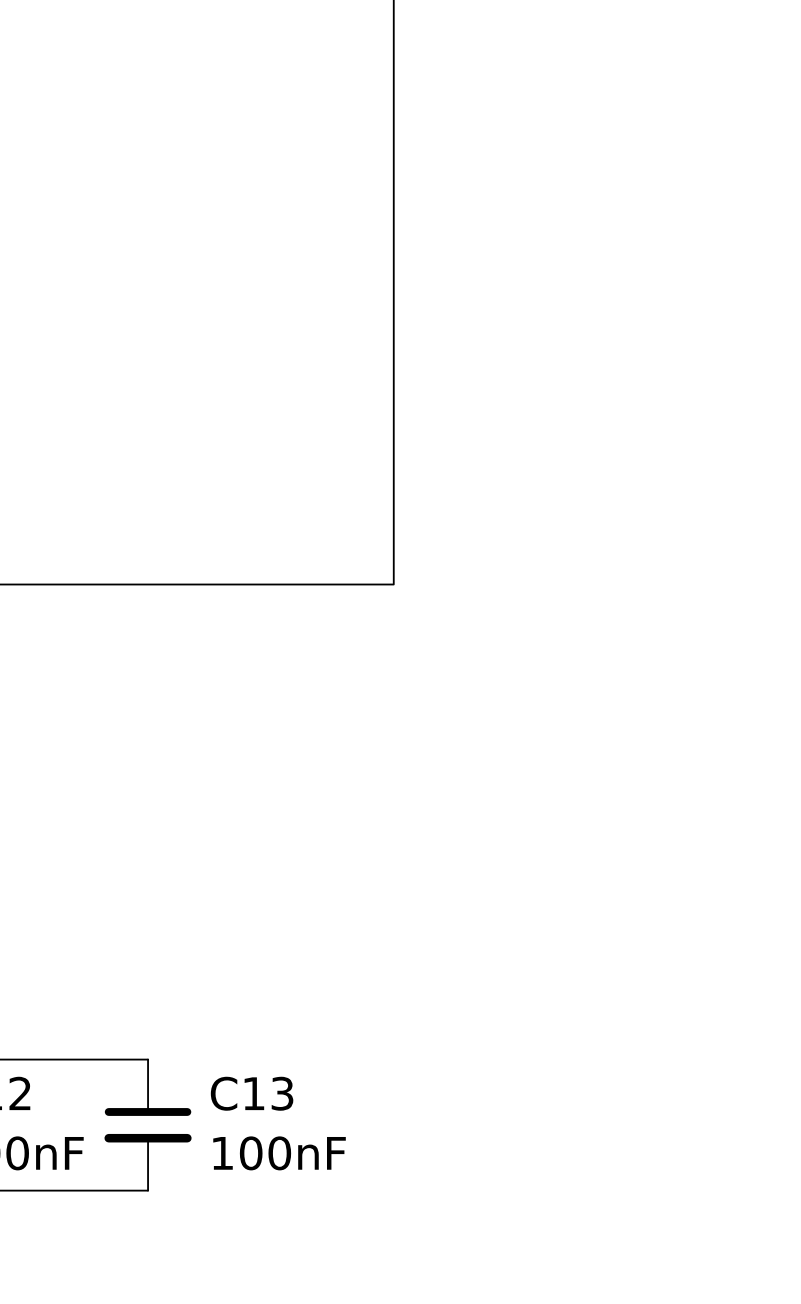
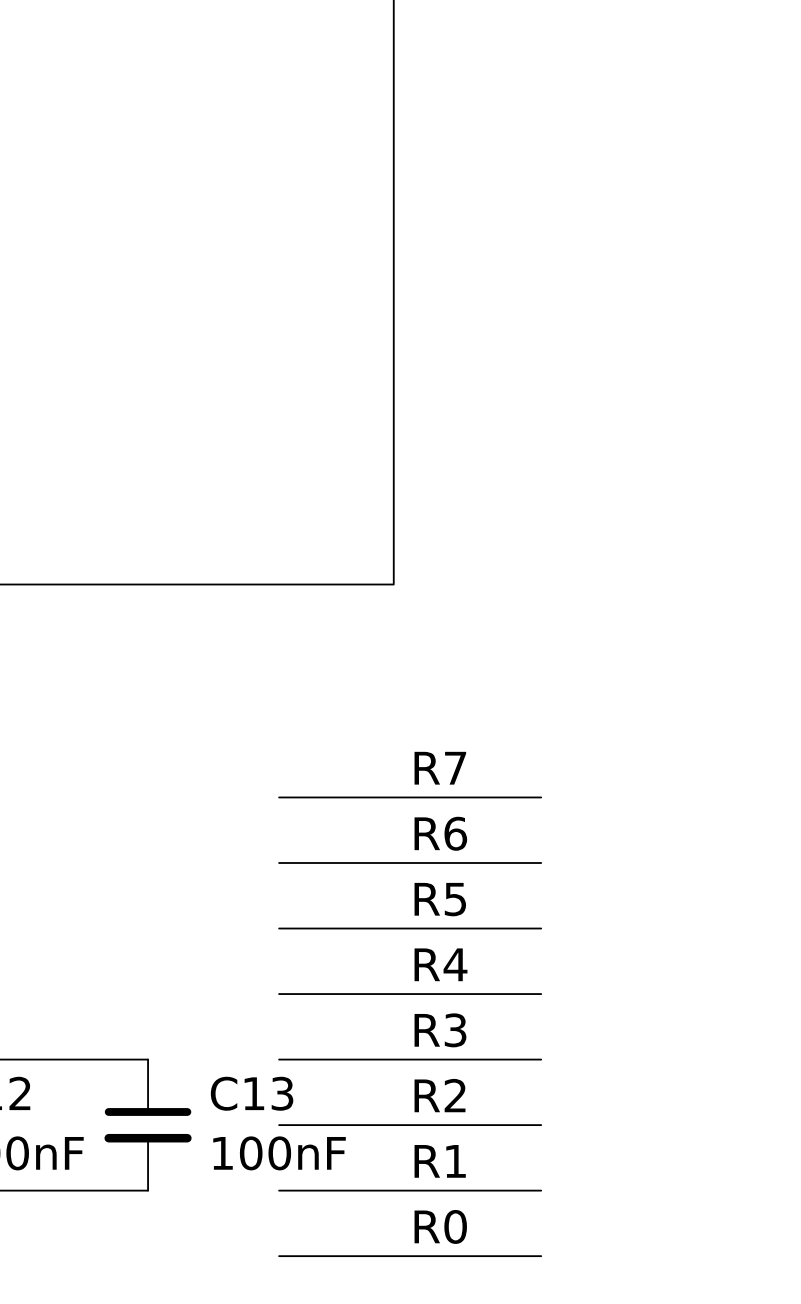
label: none -> R7 (440, 768)
wire: none -> (279, 797) (541, 797)
label: none -> R6 (440, 833)
wire: none -> (279, 862) (541, 862)
label: none -> R5 (440, 899)
wire: none -> (279, 928) (541, 928)
label: none -> R4 (441, 964)
wire: none -> (279, 994) (541, 994)
label: none -> R3 (440, 1030)
wire: none -> (279, 1059) (541, 1059)
label: none -> R2 (440, 1095)
wire: none -> (279, 1125) (541, 1125)
label: none -> R1 (440, 1161)
wire: none -> (279, 1190) (541, 1190)
label: none -> R0 (440, 1226)
wire: none -> (279, 1256) (541, 1256)

